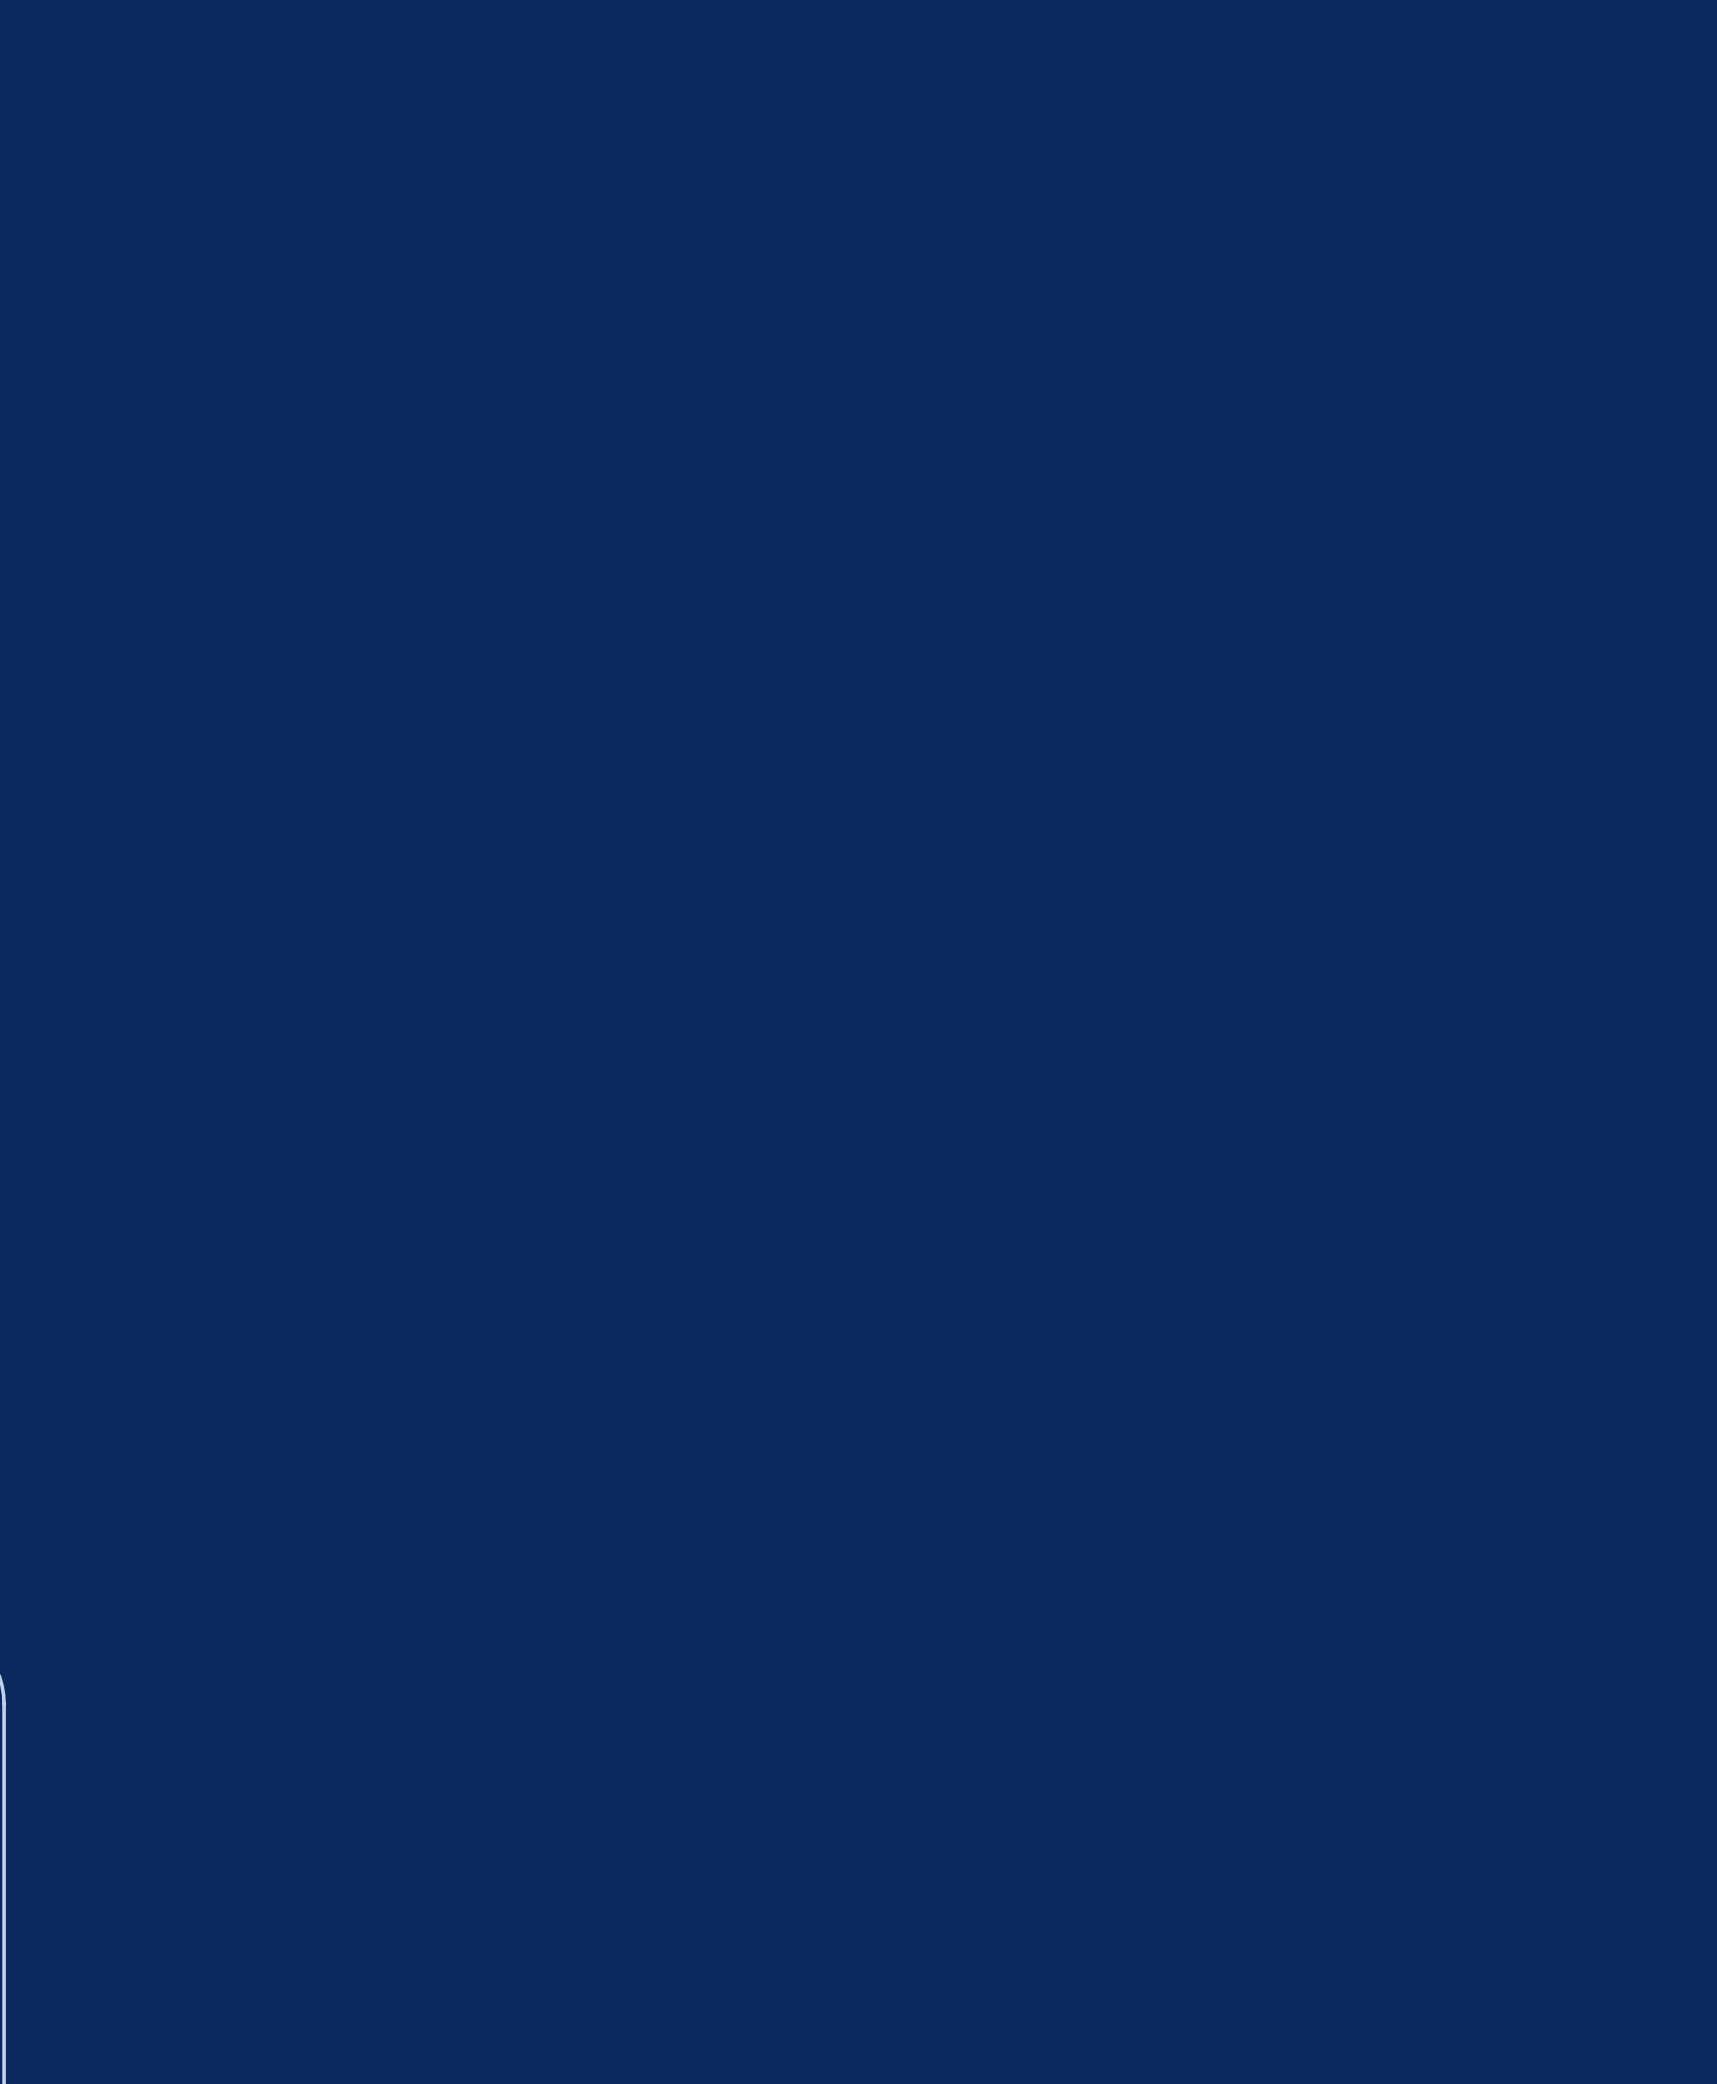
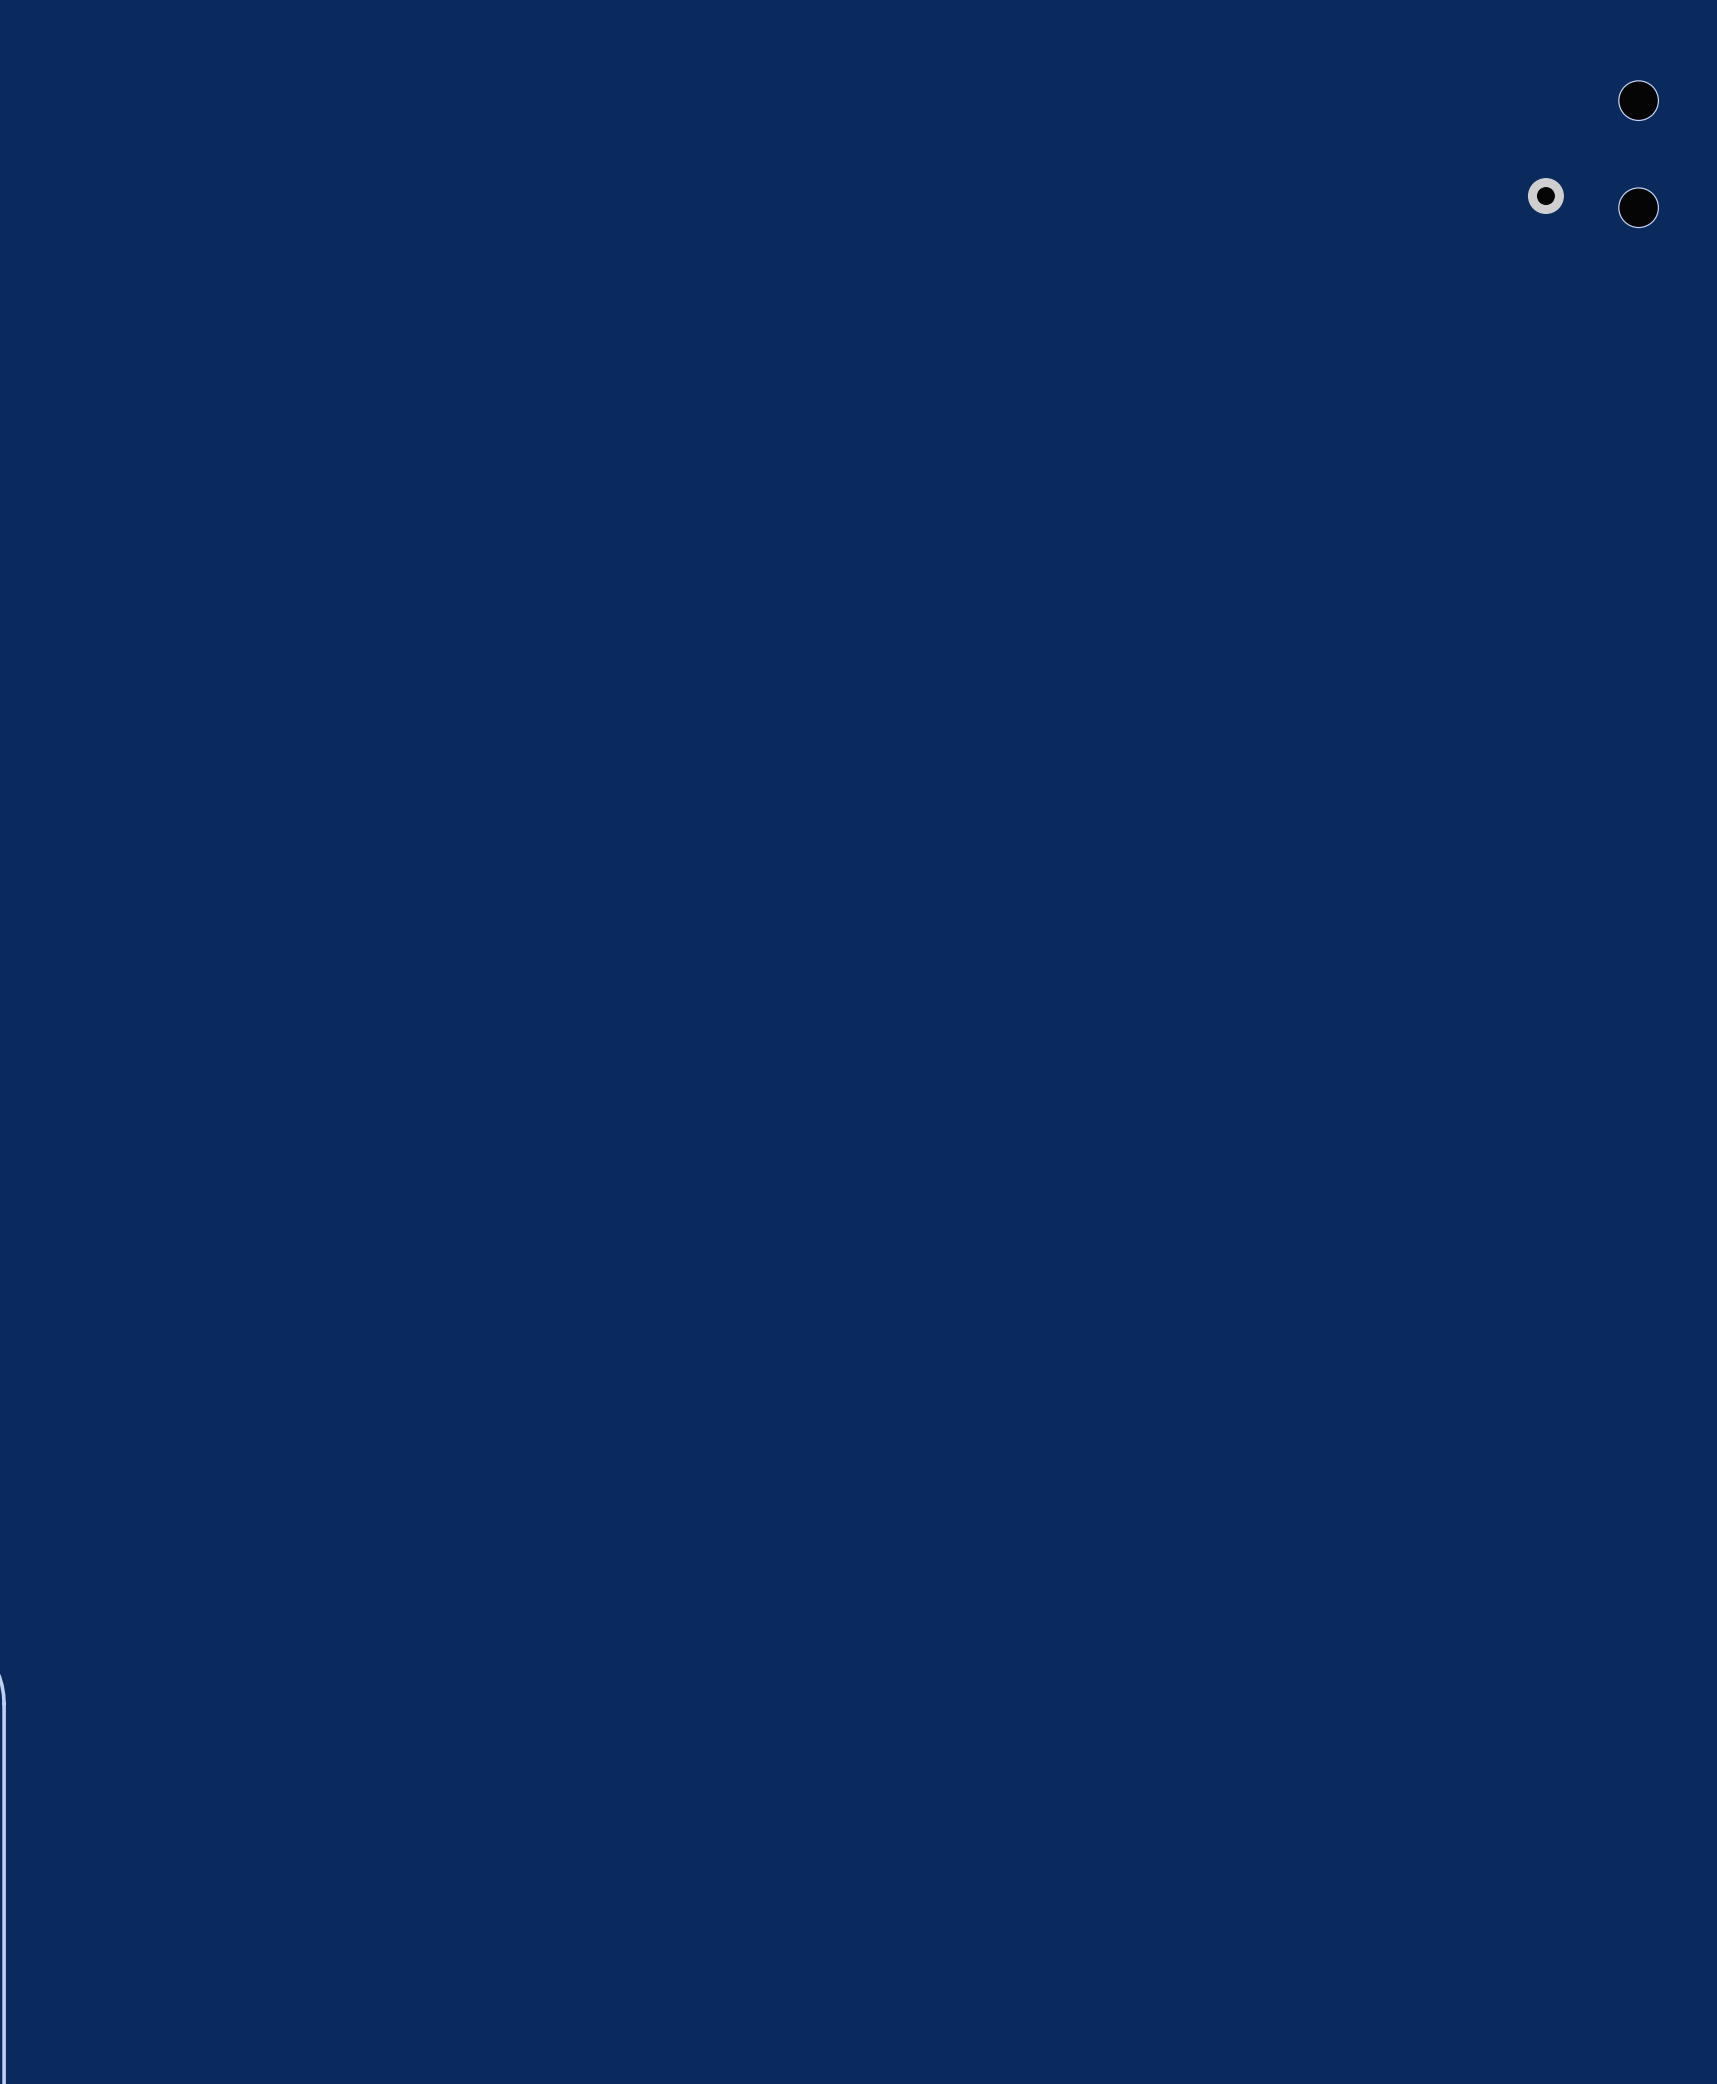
part: none -> (1638, 100)
part: none -> (1545, 196)
part: none -> (1638, 207)

